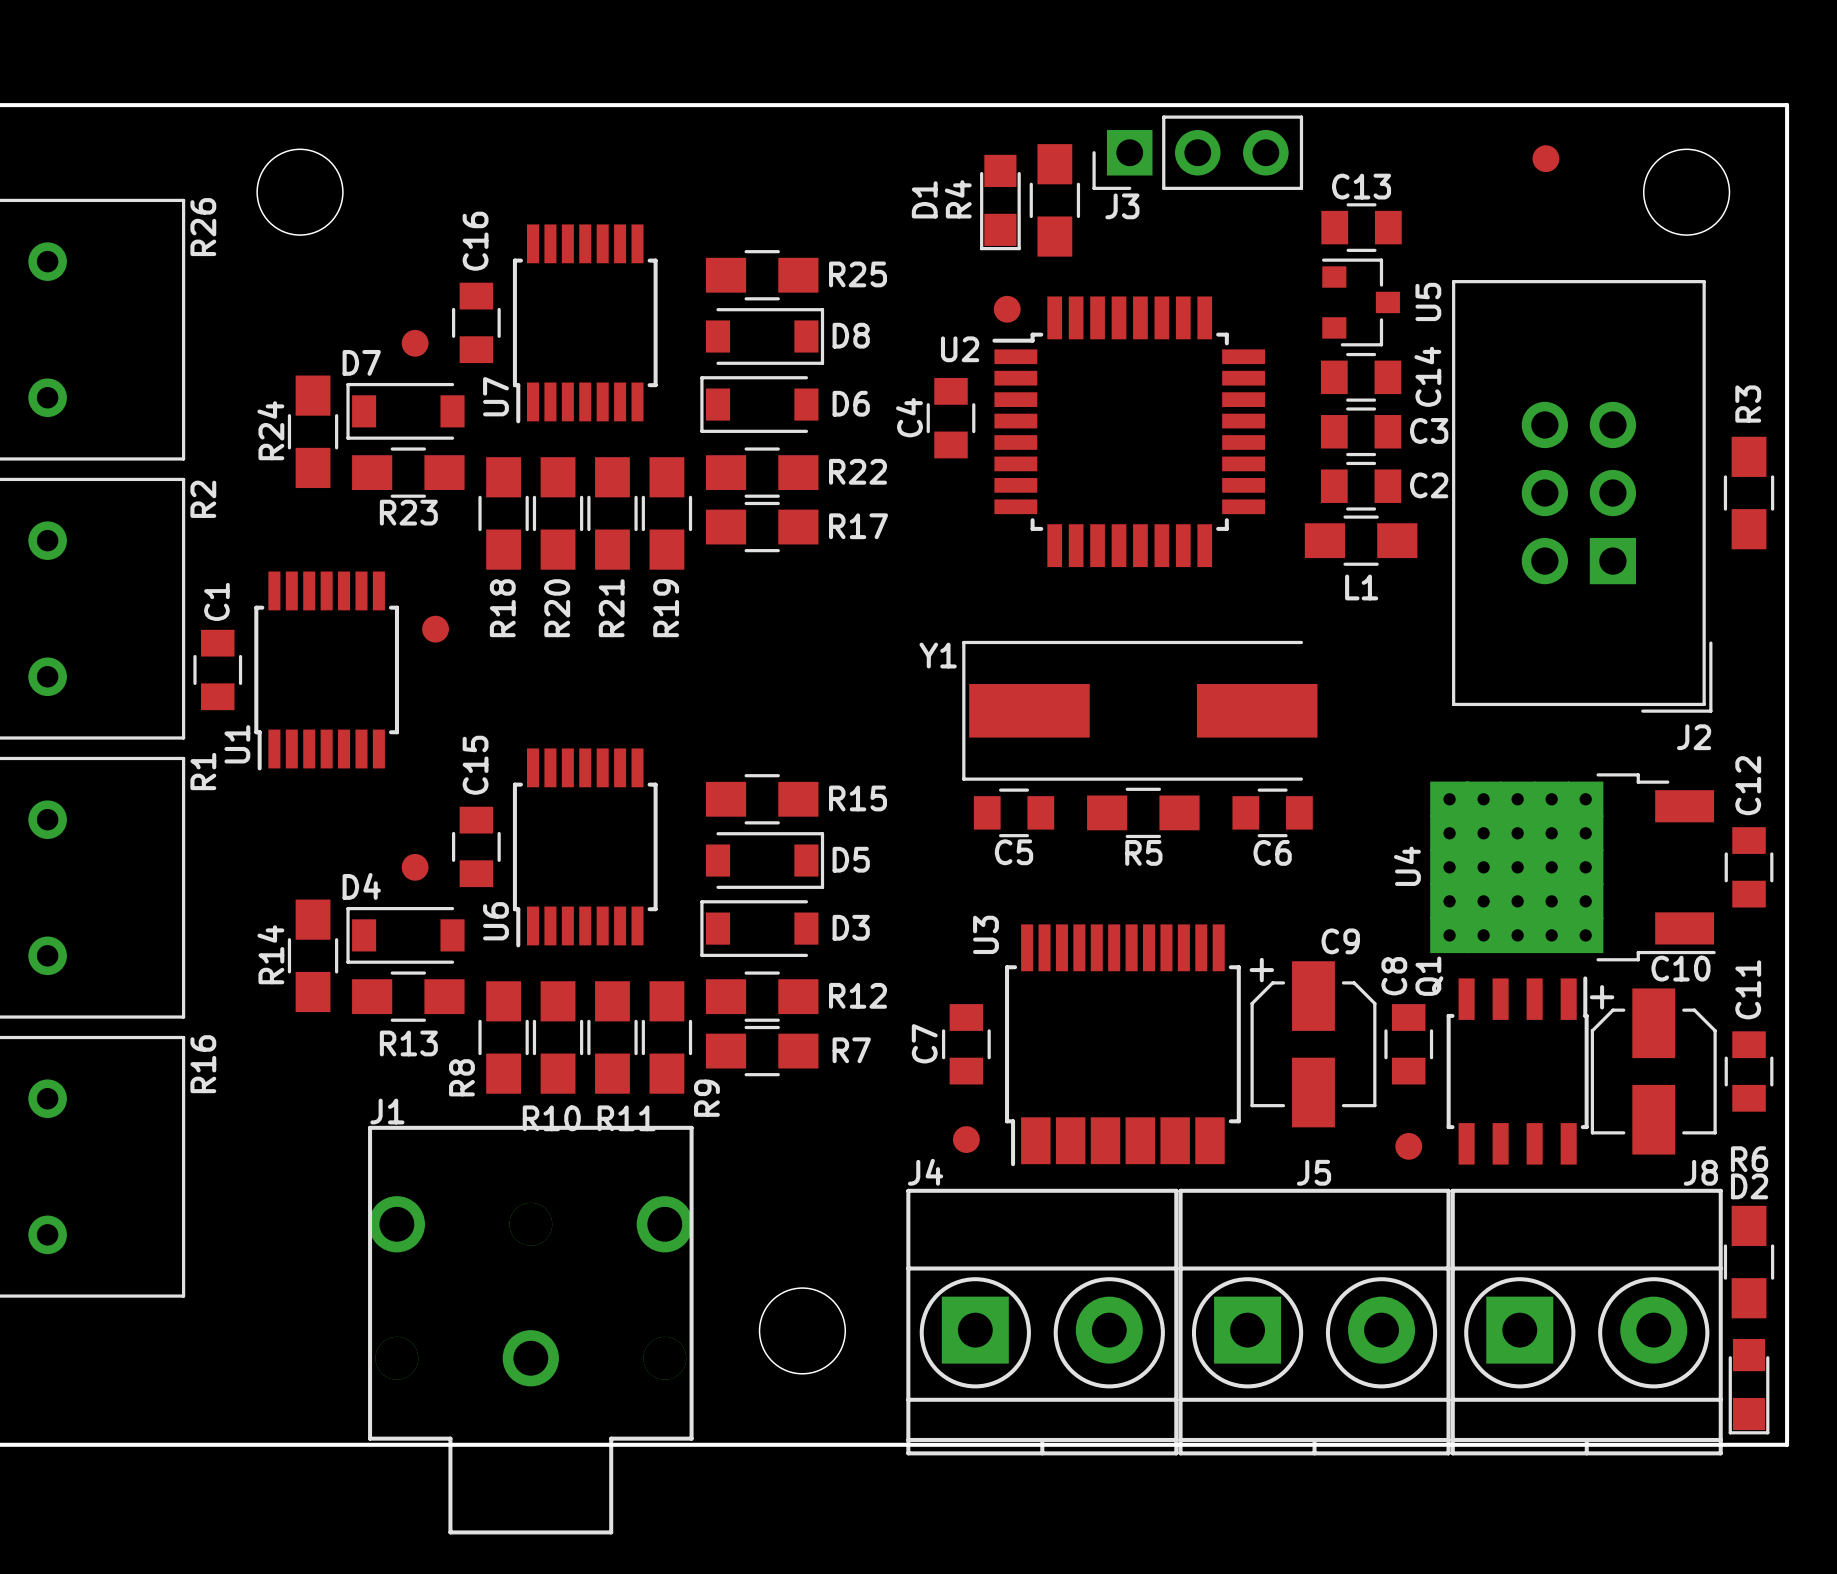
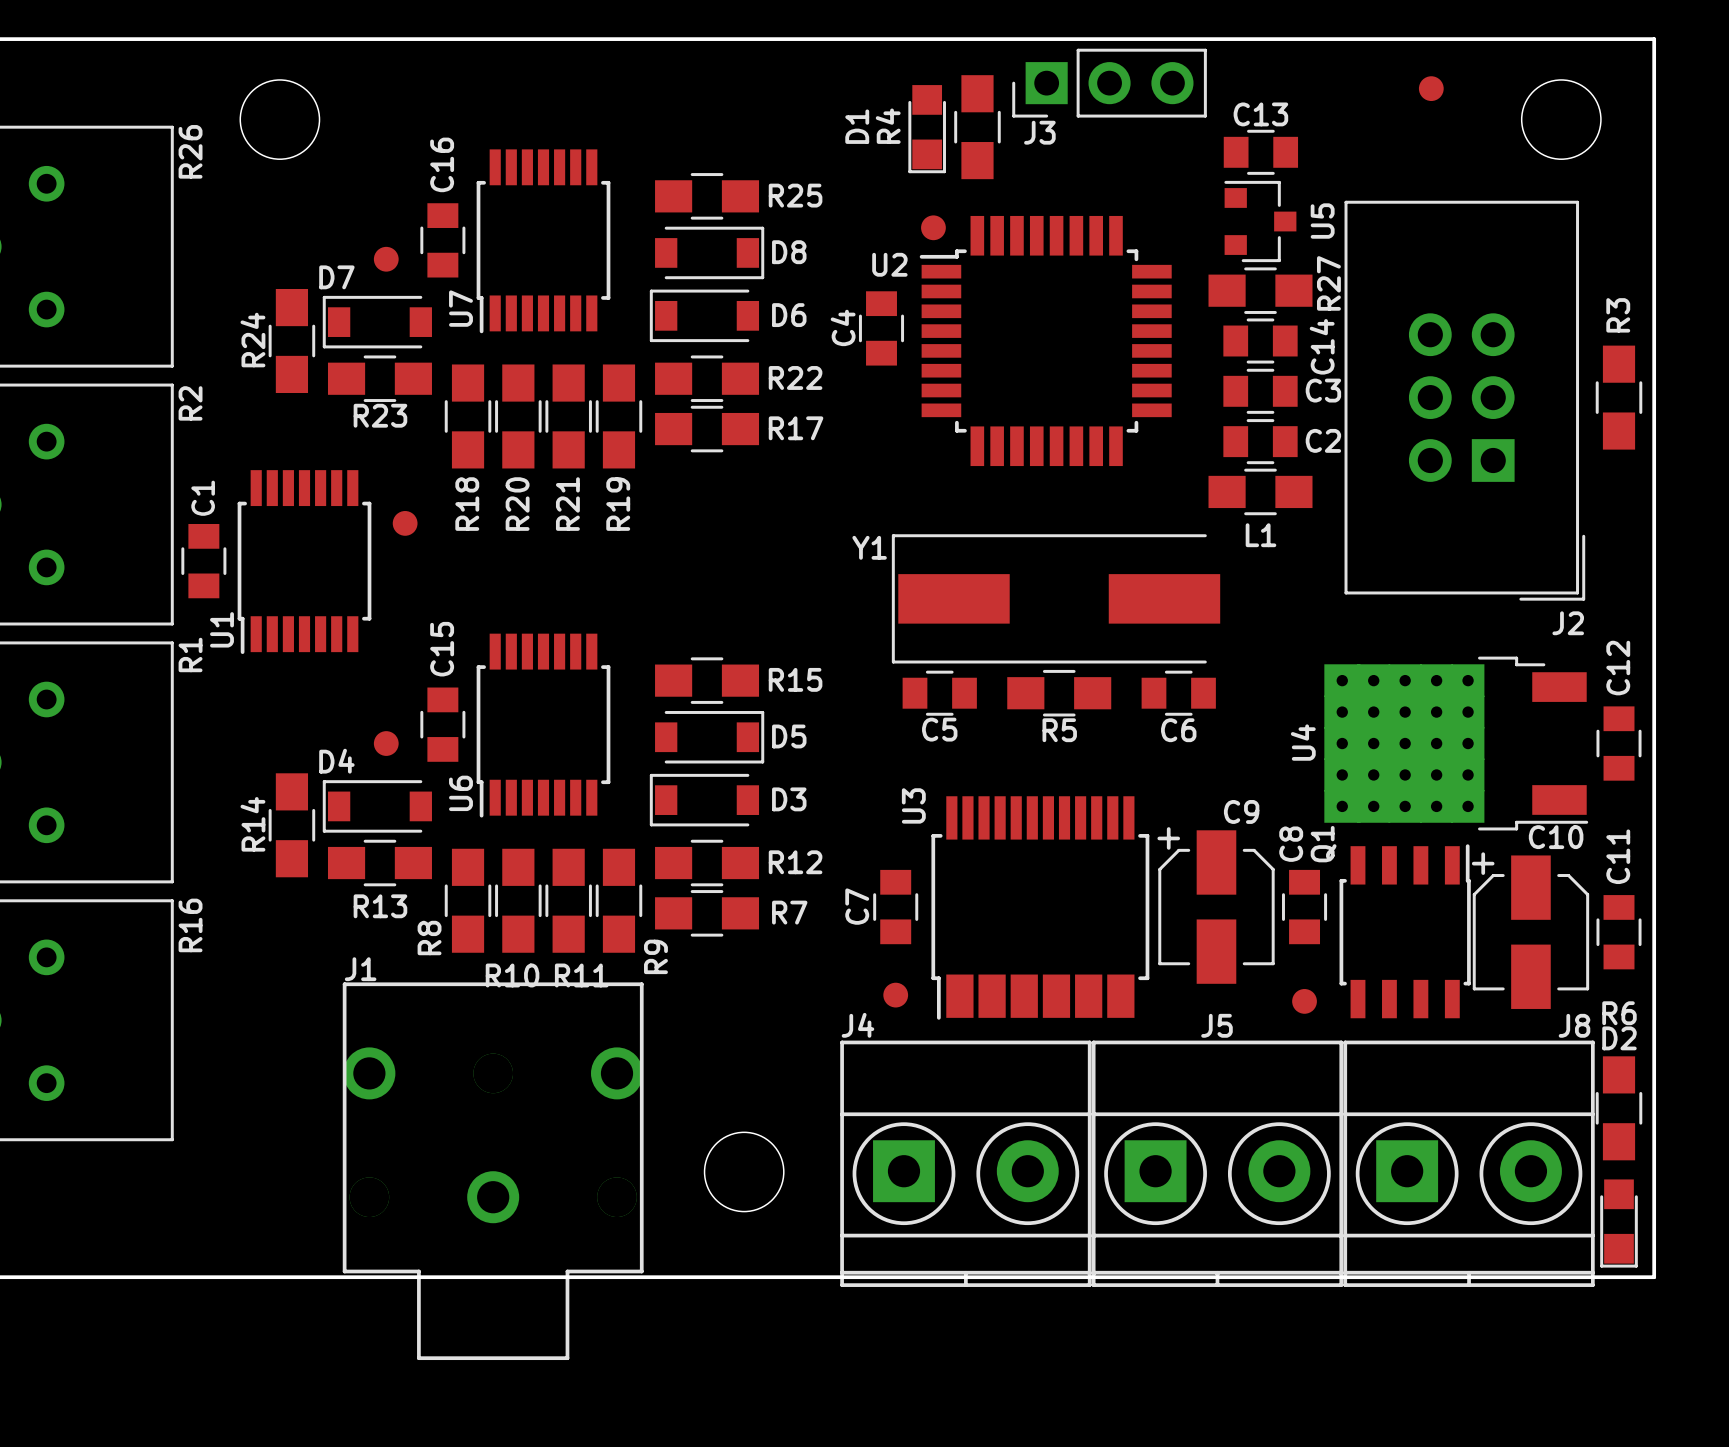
C14: (1361, 377) -> none
R27: none -> (1260, 290)
C3 name: C3 (1429, 430) -> C14 (1322, 346)
C2 name: C2 (1429, 485) -> C3 (1323, 390)
L1 position: (1361, 540) -> (1260, 491)
C2: none -> (1260, 441)

